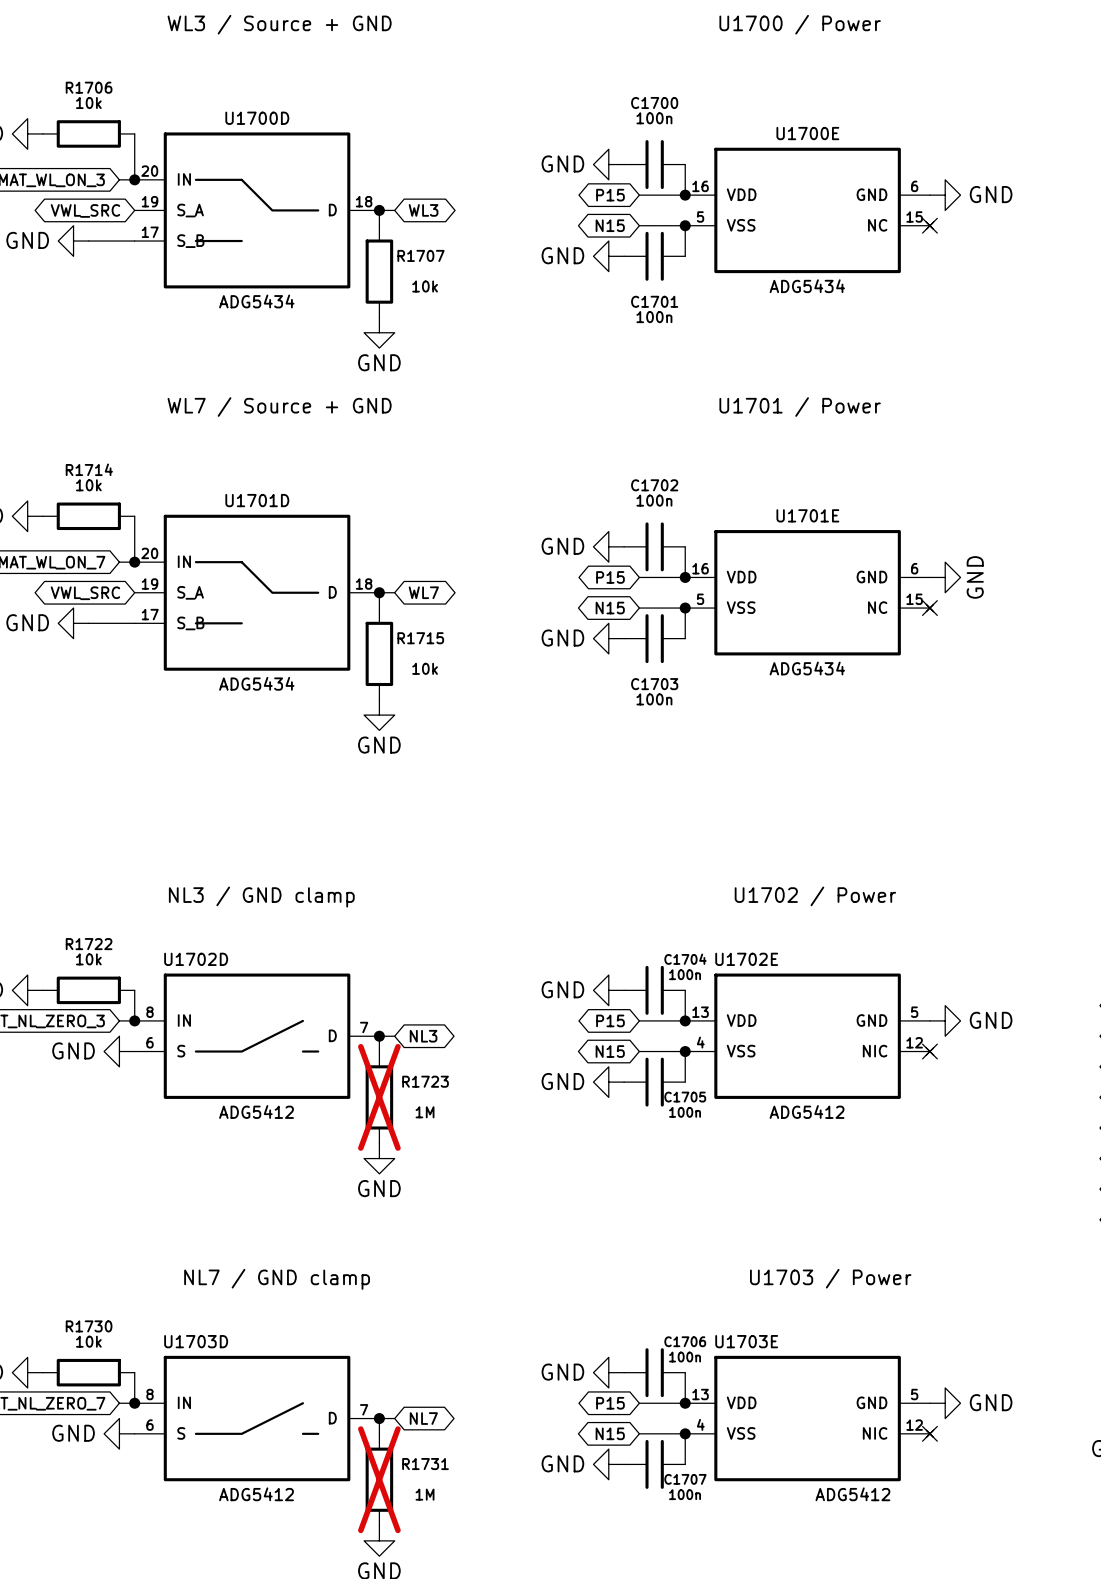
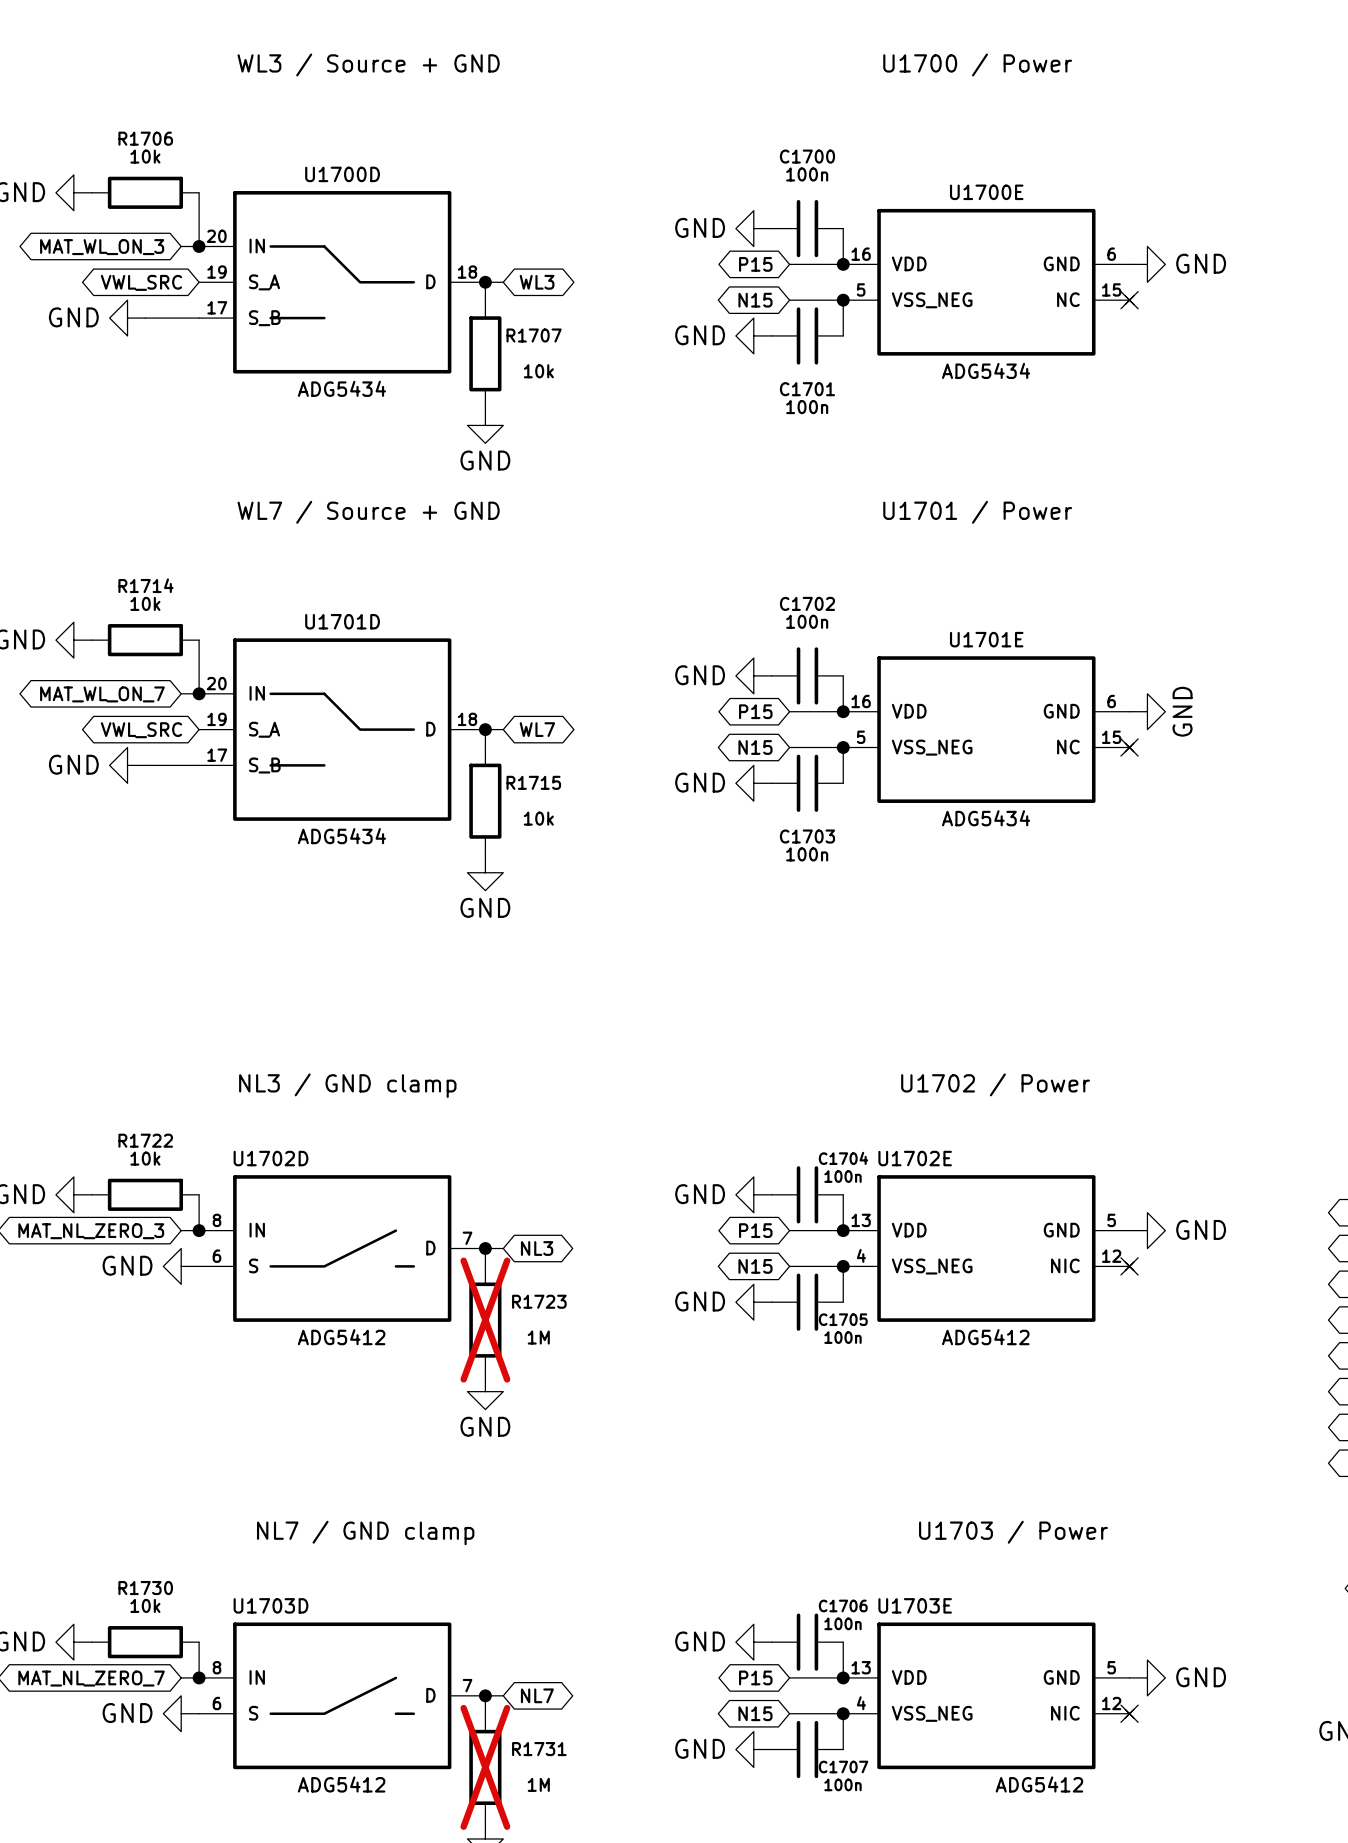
U1700E pin name: VSS (741, 225) -> VSS_NEG (932, 300)
U1701E pin name: VSS (741, 607) -> VSS_NEG (932, 747)
U1702E pin name: VSS (741, 1051) -> VSS_NEG (932, 1266)
U1703E pin name: VSS (741, 1433) -> VSS_NEG (932, 1713)

